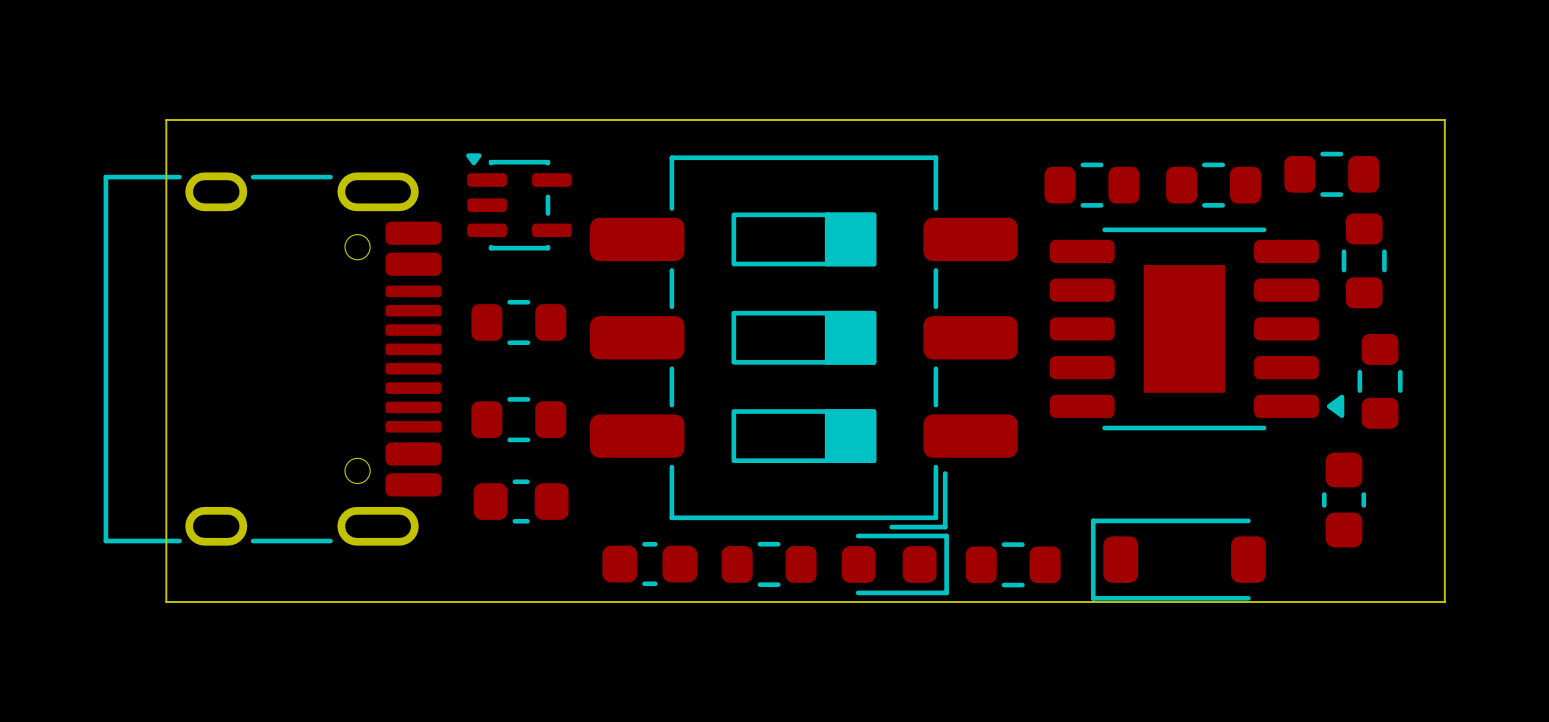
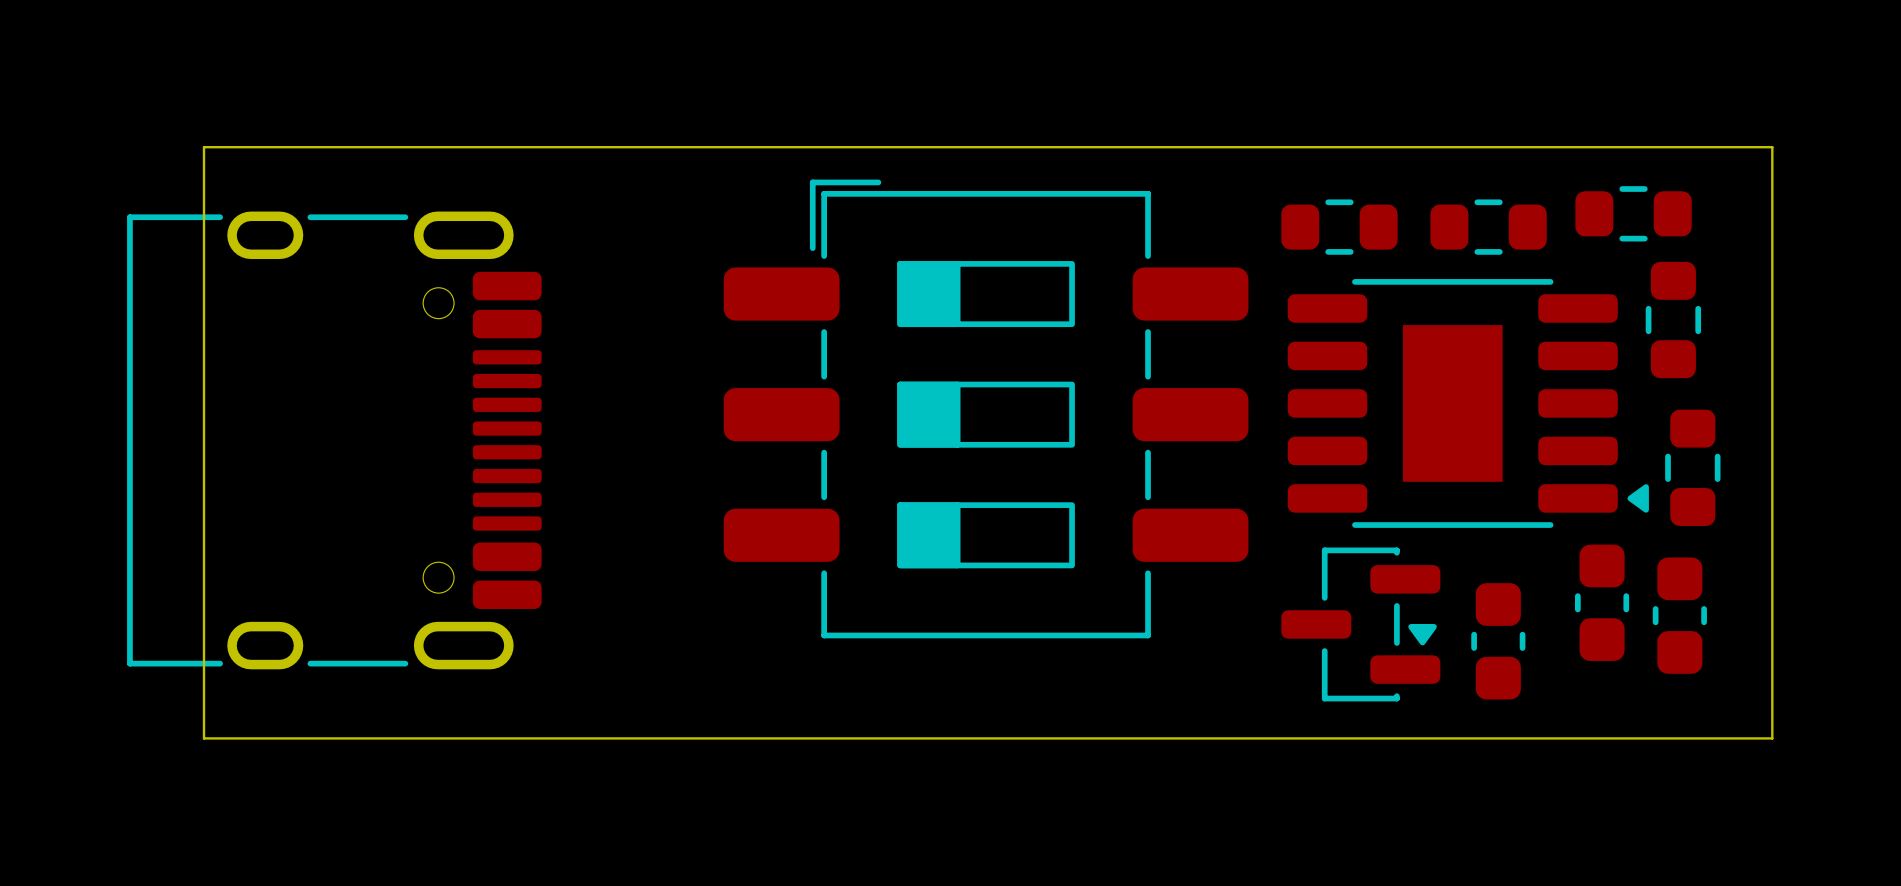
part: (518, 201) -> none
part: (518, 322) -> none
part rotation: 0° (803, 342) -> 180° (986, 408)
part: (518, 419) -> none
part: none -> (1602, 602)
part: (1344, 499) -> none
part: (521, 501) -> none
part: none -> (1679, 615)
part: none -> (1360, 624)
part: none -> (1498, 641)
part: (1178, 559) -> none
part: (649, 564) -> none
part: (769, 564) -> none
part: (895, 564) -> none
part: (1013, 564) -> none

